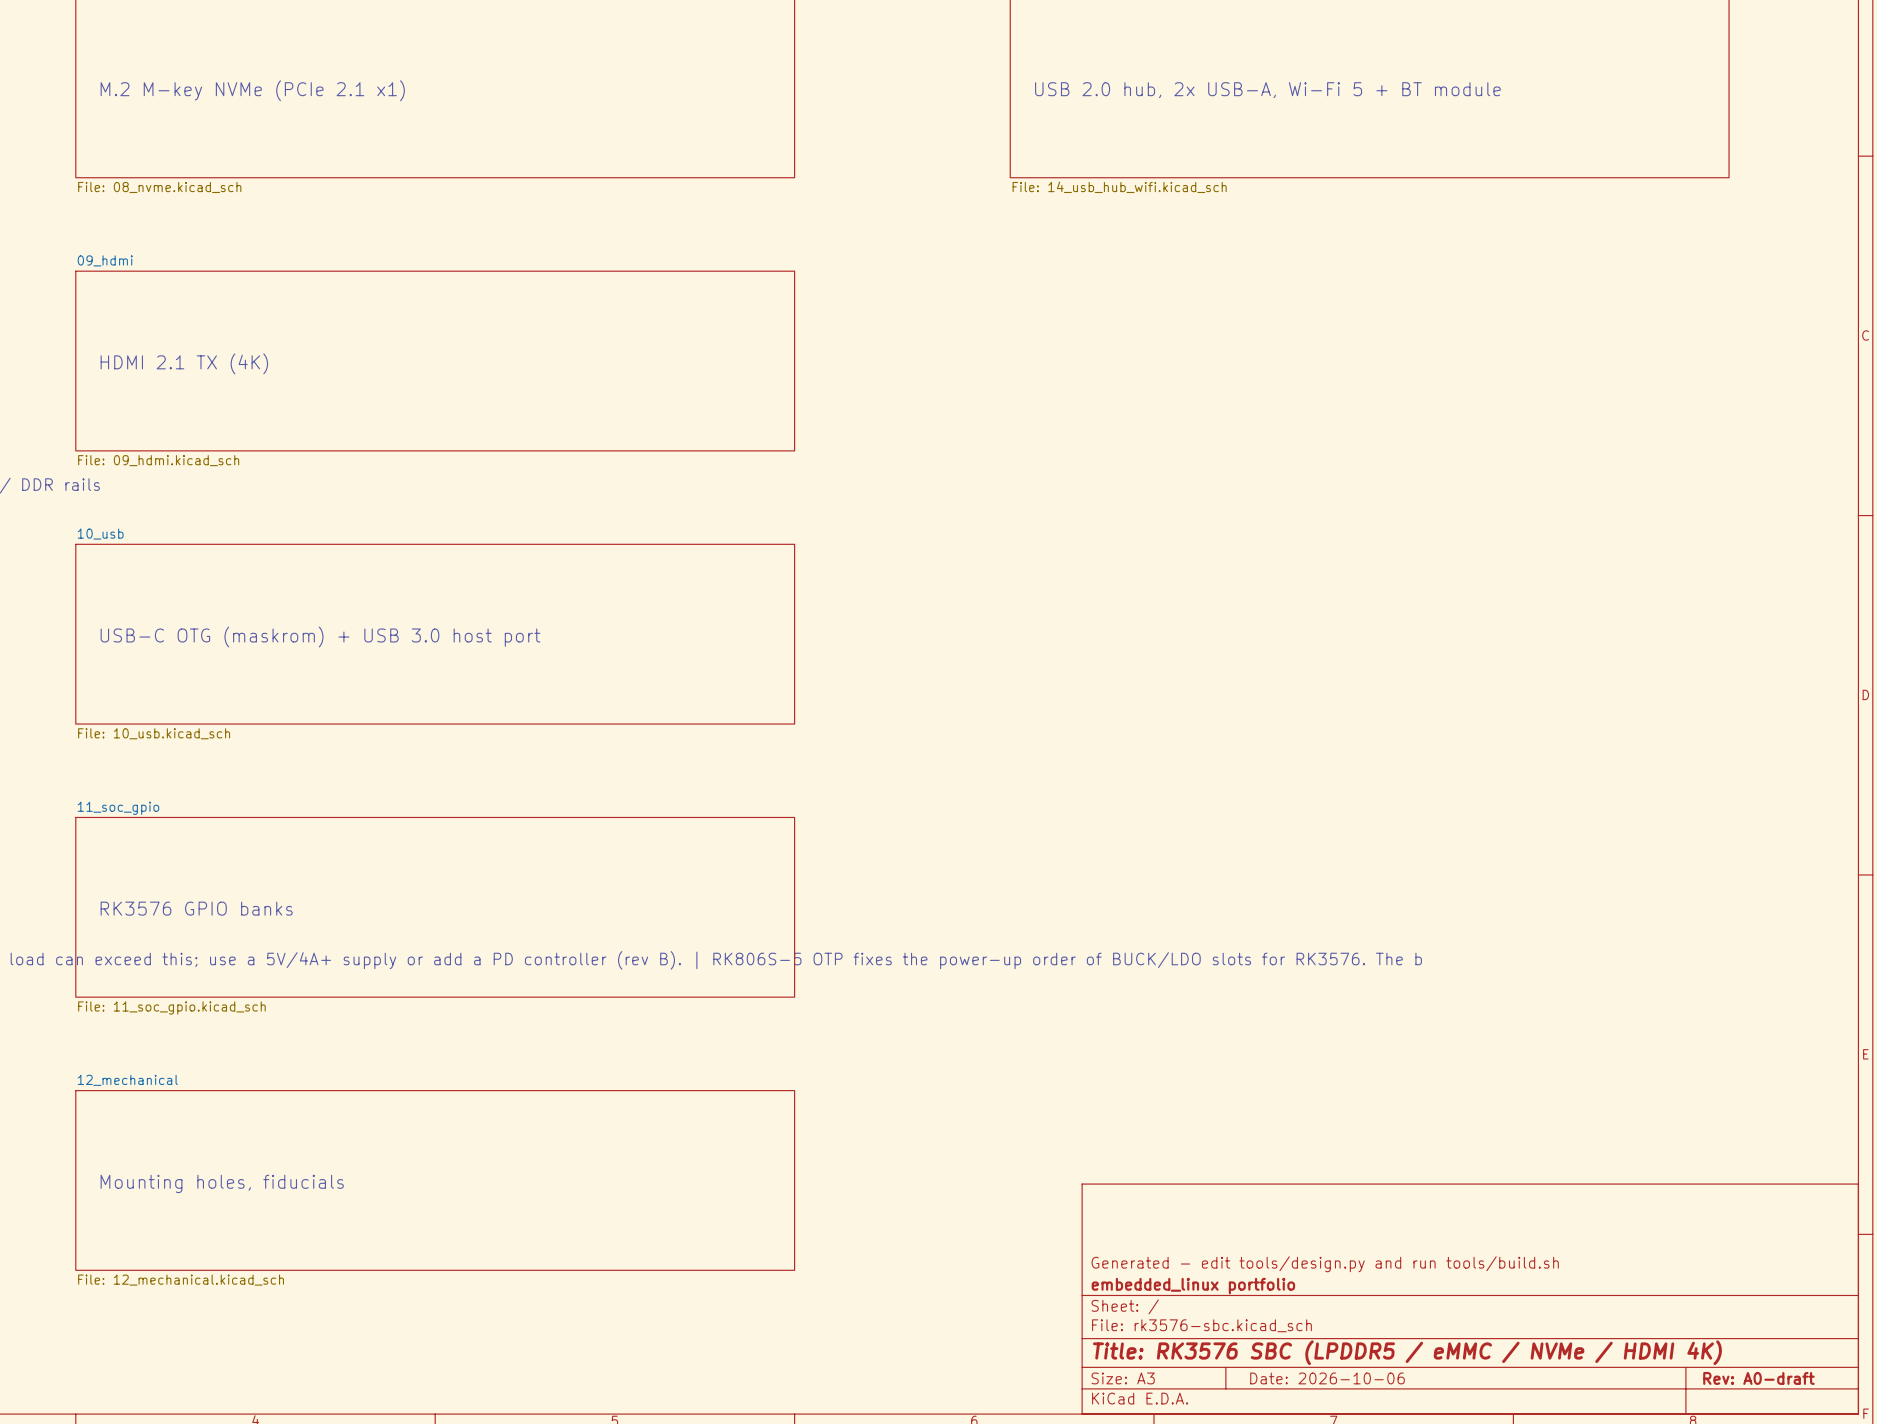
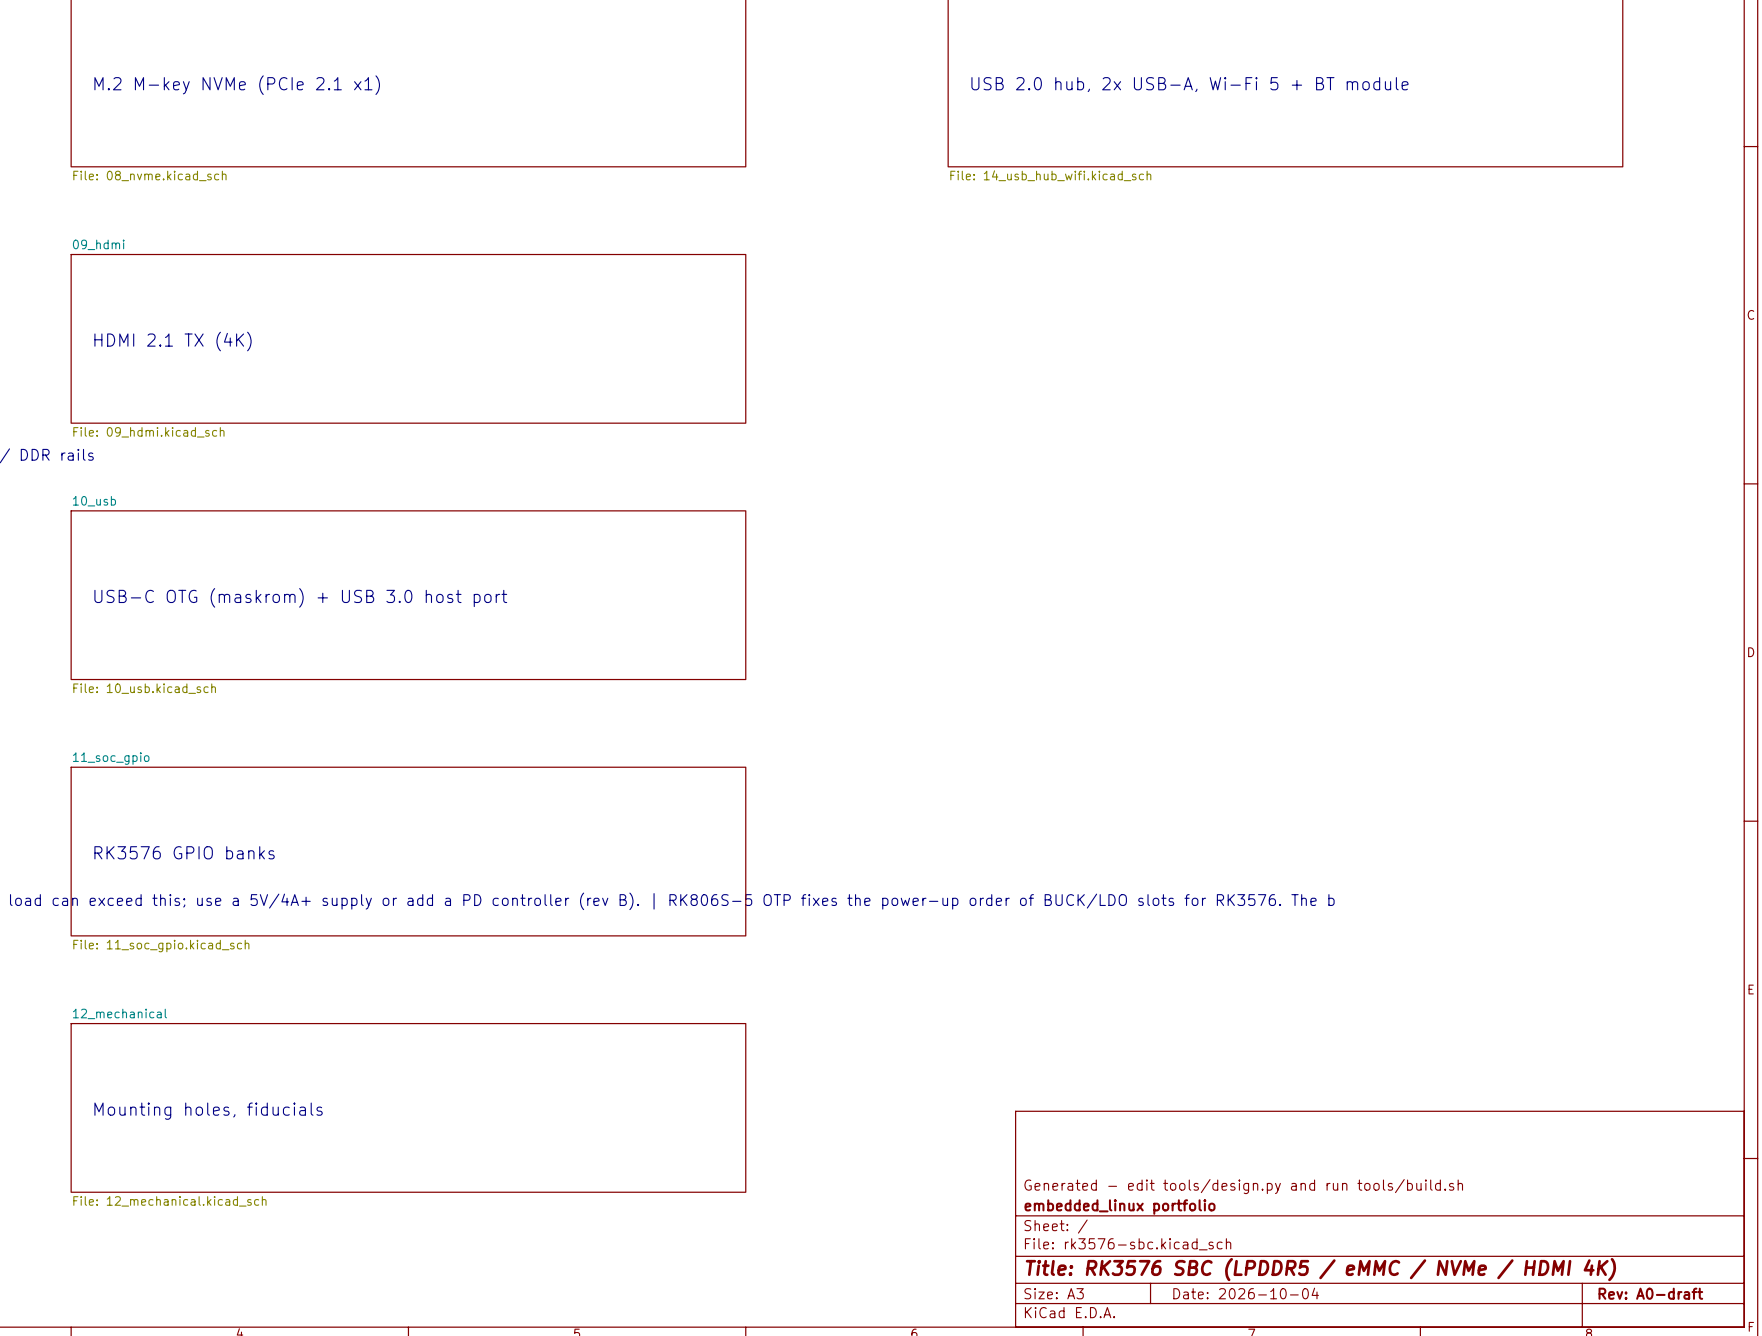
title block: Date: 2026-10-06 (1327, 1378) -> Date: 2026-10-04 (1246, 1293)

